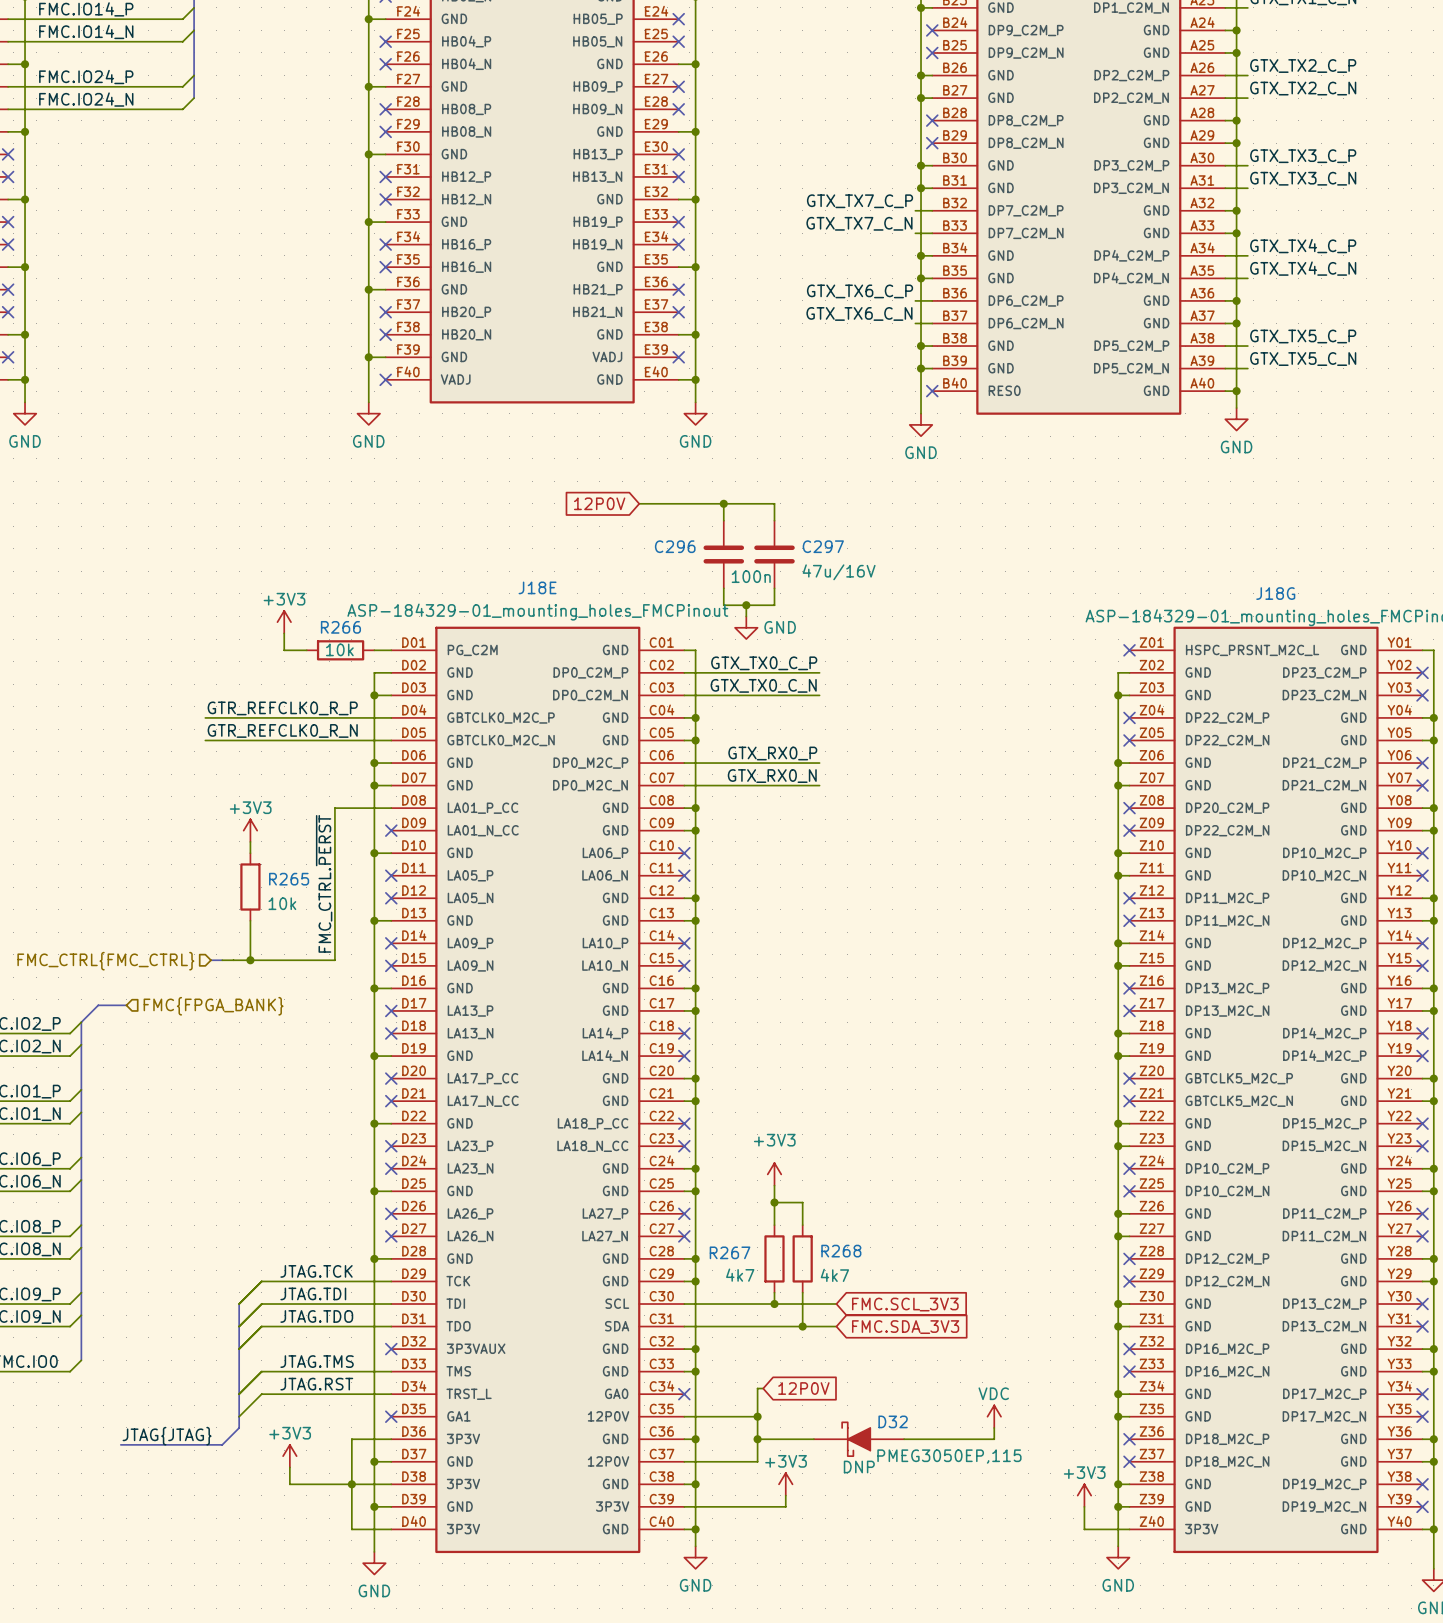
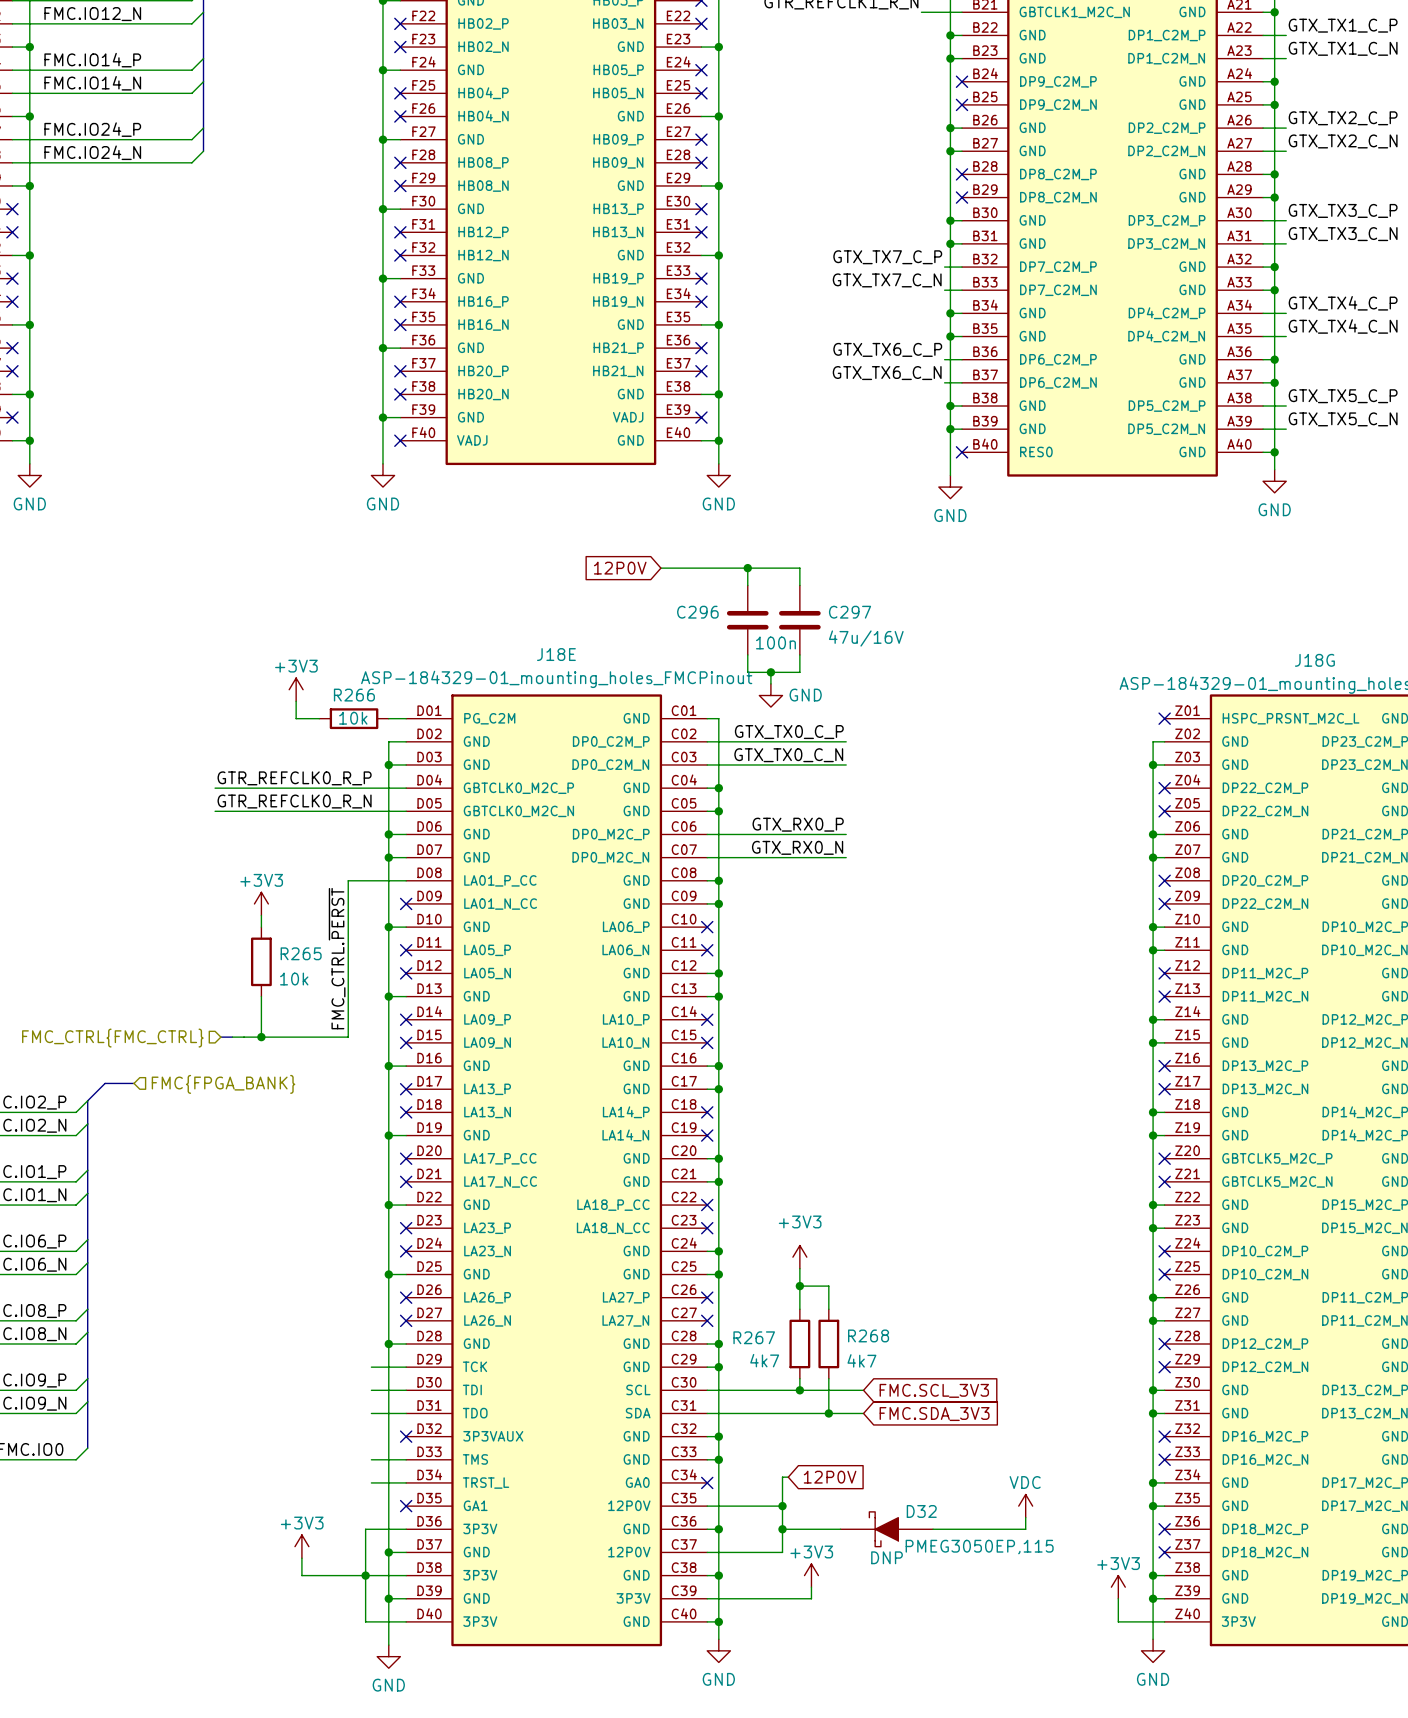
label: JTAG.TCK (316, 1271) -> none
wire: (357, 1281) (261, 1281) (239, 1304) -> none
label: JTAG.TDI (313, 1293) -> none
bus: (239, 1304) (239, 1427) (222, 1444) (120, 1444) -> none
wire: (357, 1304) (261, 1304) (239, 1326) -> none
label: JTAG.TDO (316, 1316) -> none
wire: (357, 1326) (261, 1326) (239, 1349) -> none
label: JTAG.TMS (317, 1361) -> none
wire: (357, 1371) (261, 1371) (239, 1394) -> none
label: JTAG.RST (316, 1384) -> none
wire: (357, 1394) (261, 1394) (239, 1416) -> none
label: JTAG{JTAG} (167, 1436) -> none

